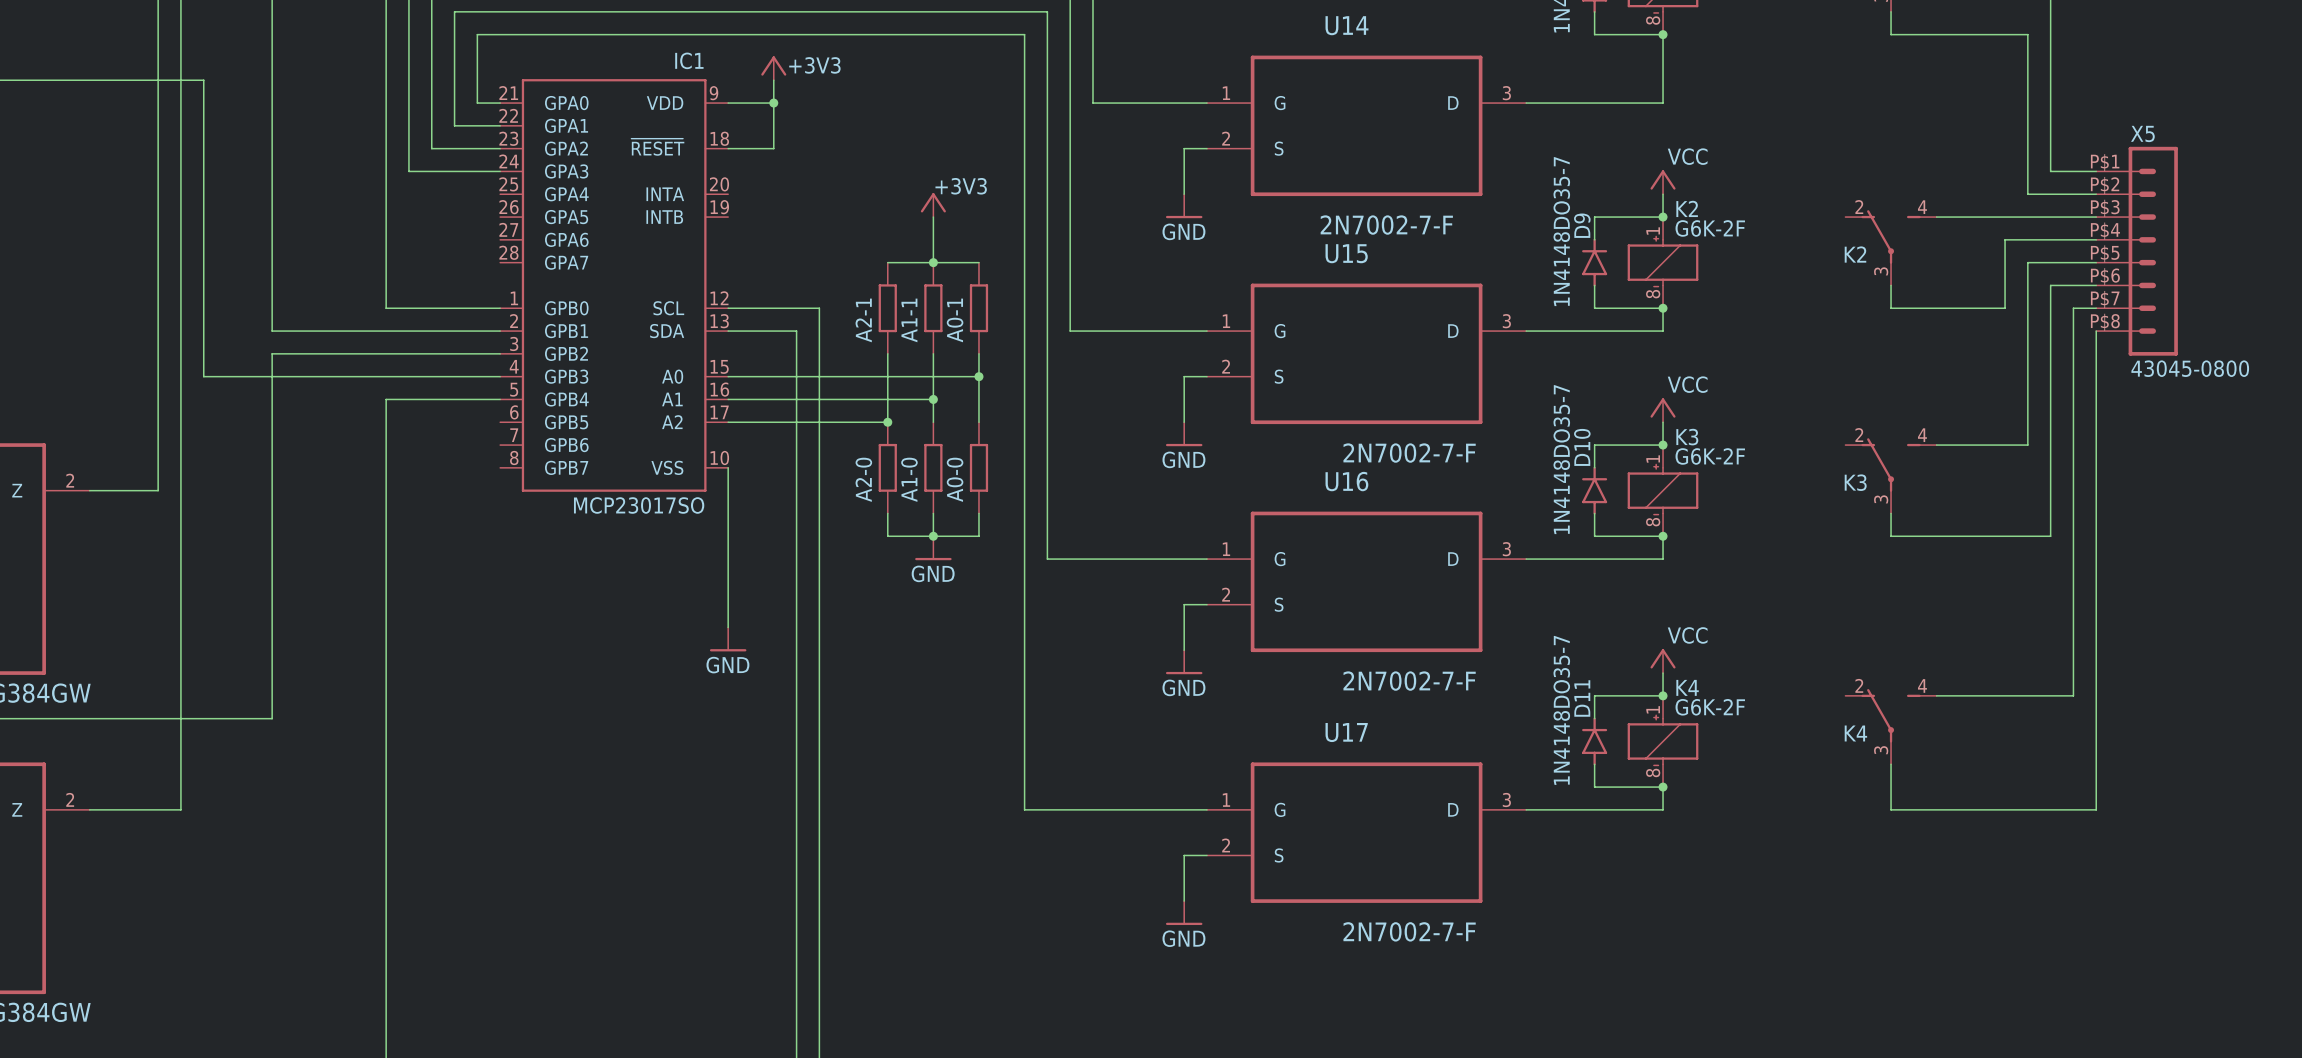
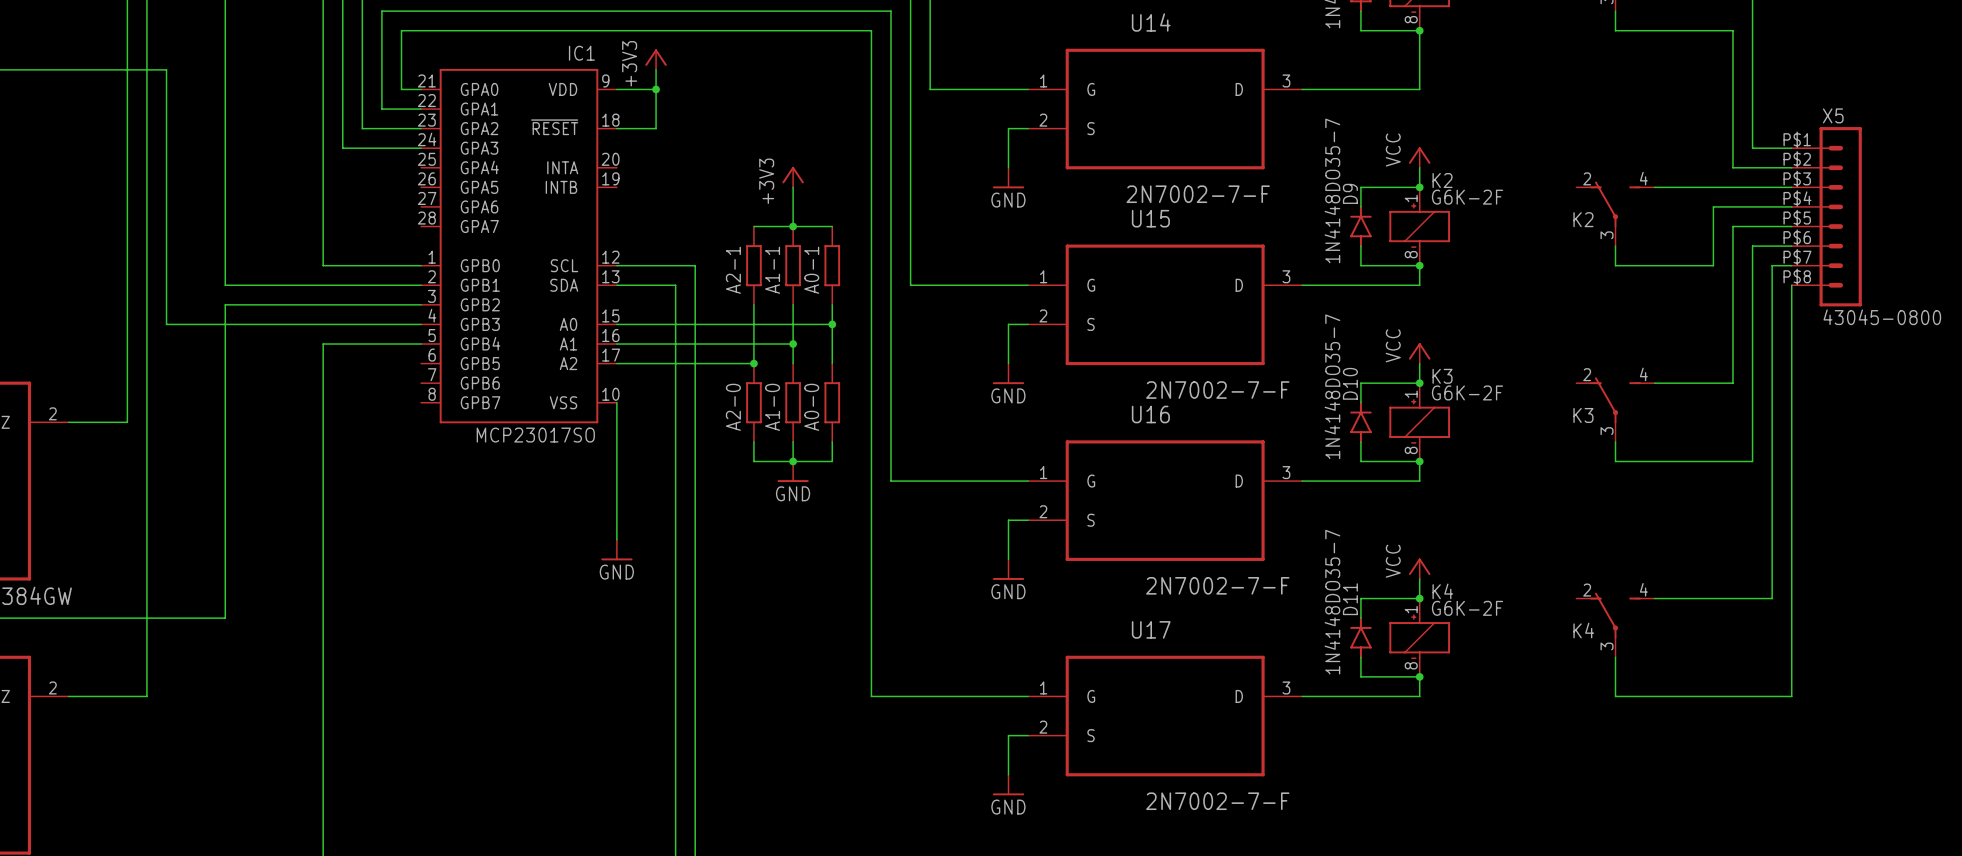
power symbol text rotation: 0° (814, 65) -> 90° counterclockwise (629, 63)
power symbol text rotation: 0° (1687, 156) -> 90° counterclockwise (1393, 150)
power symbol text rotation: 0° (961, 186) -> 90° counterclockwise (766, 181)
power symbol text rotation: 0° (1687, 384) -> 90° counterclockwise (1393, 345)
power symbol text rotation: 0° (1687, 635) -> 90° counterclockwise (1393, 561)

